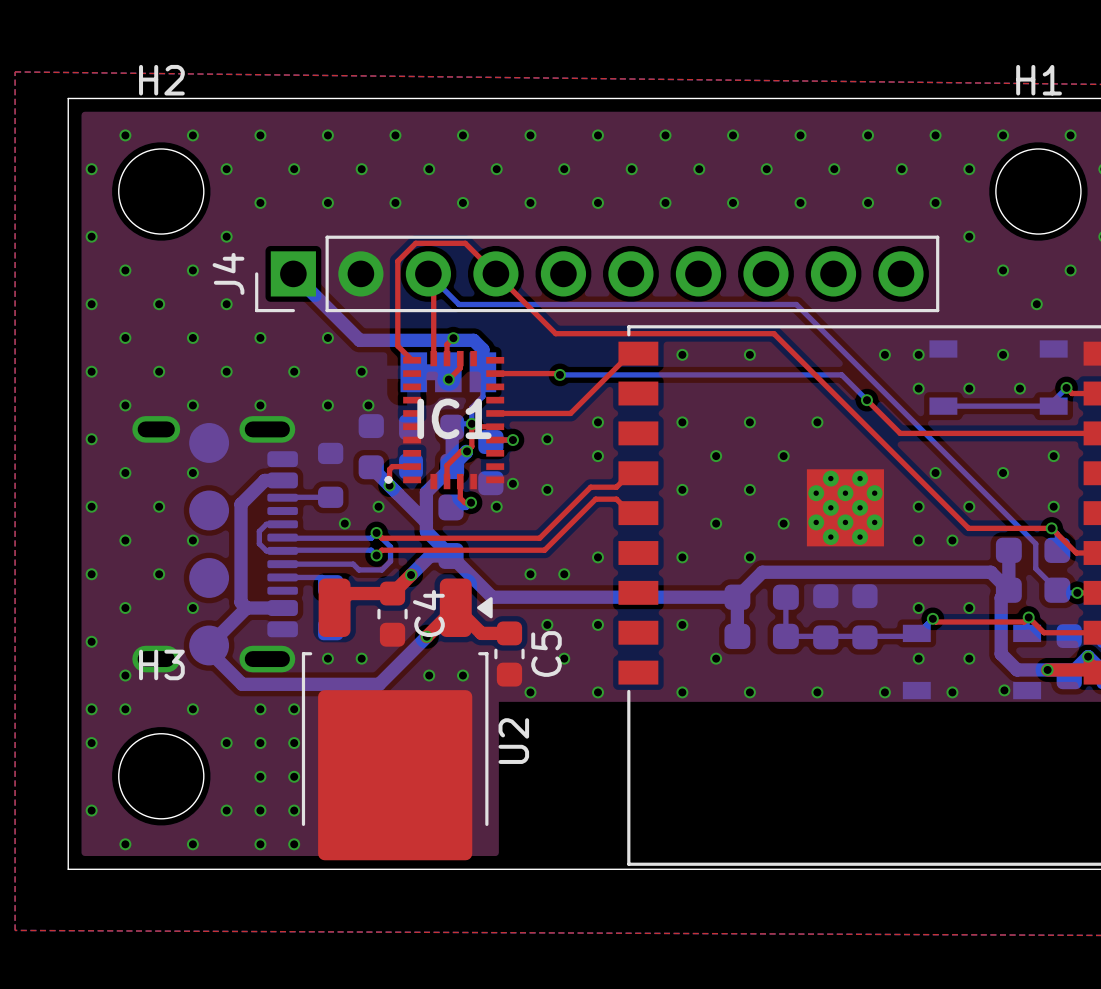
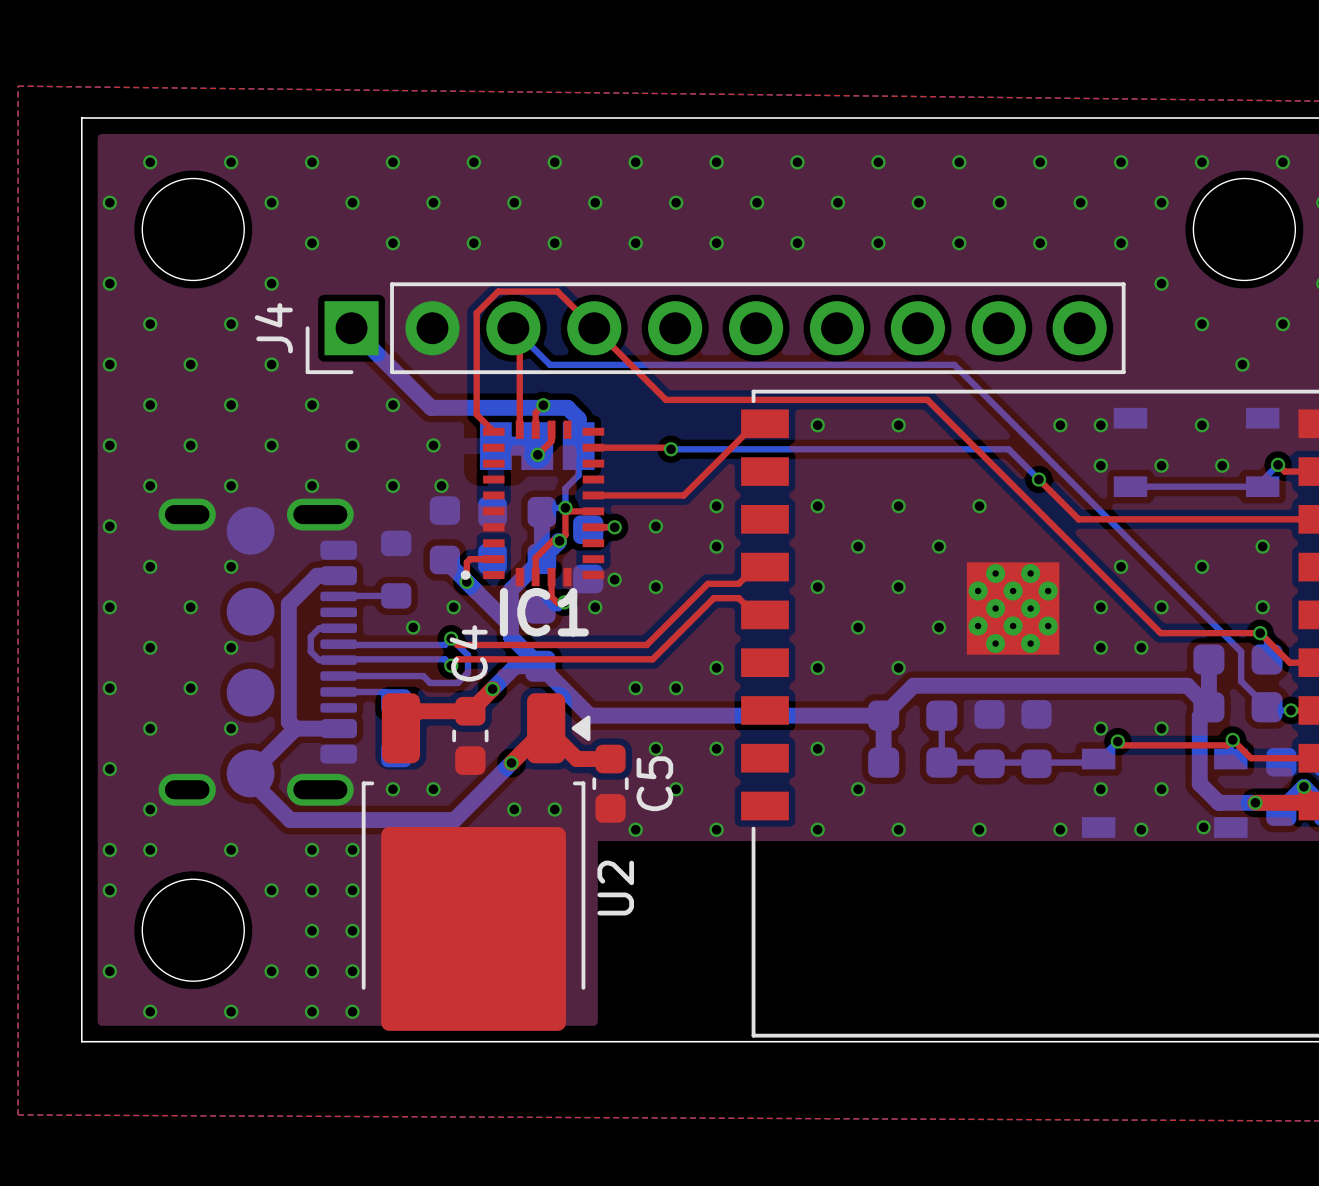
H2 name: H2 (161, 80) -> none
H1 name: H1 (1039, 80) -> none
IC1 name position: IC1 (454, 418) -> IC1 (544, 612)
C4 name position: C4 (428, 613) -> C4 (468, 653)
H3 name: H3 (161, 664) -> none

